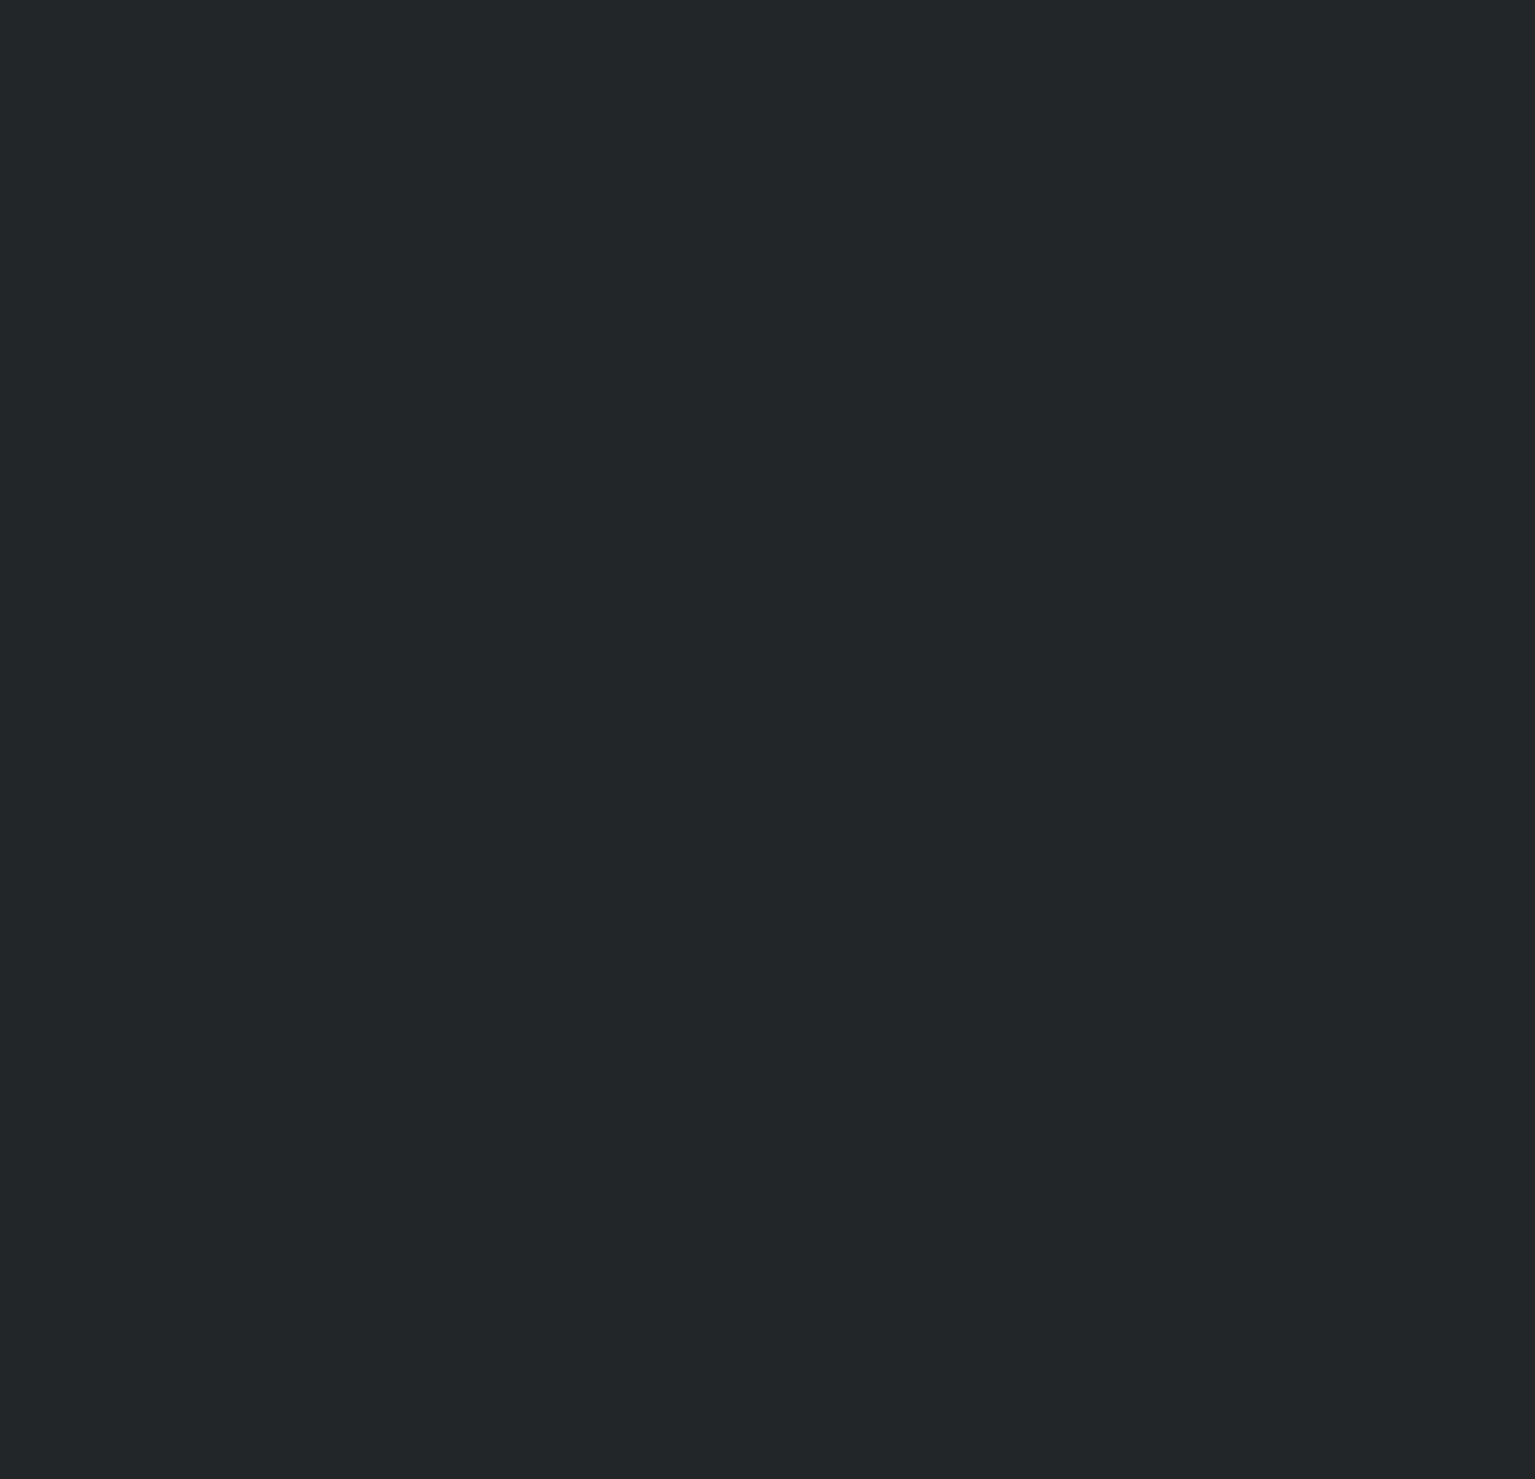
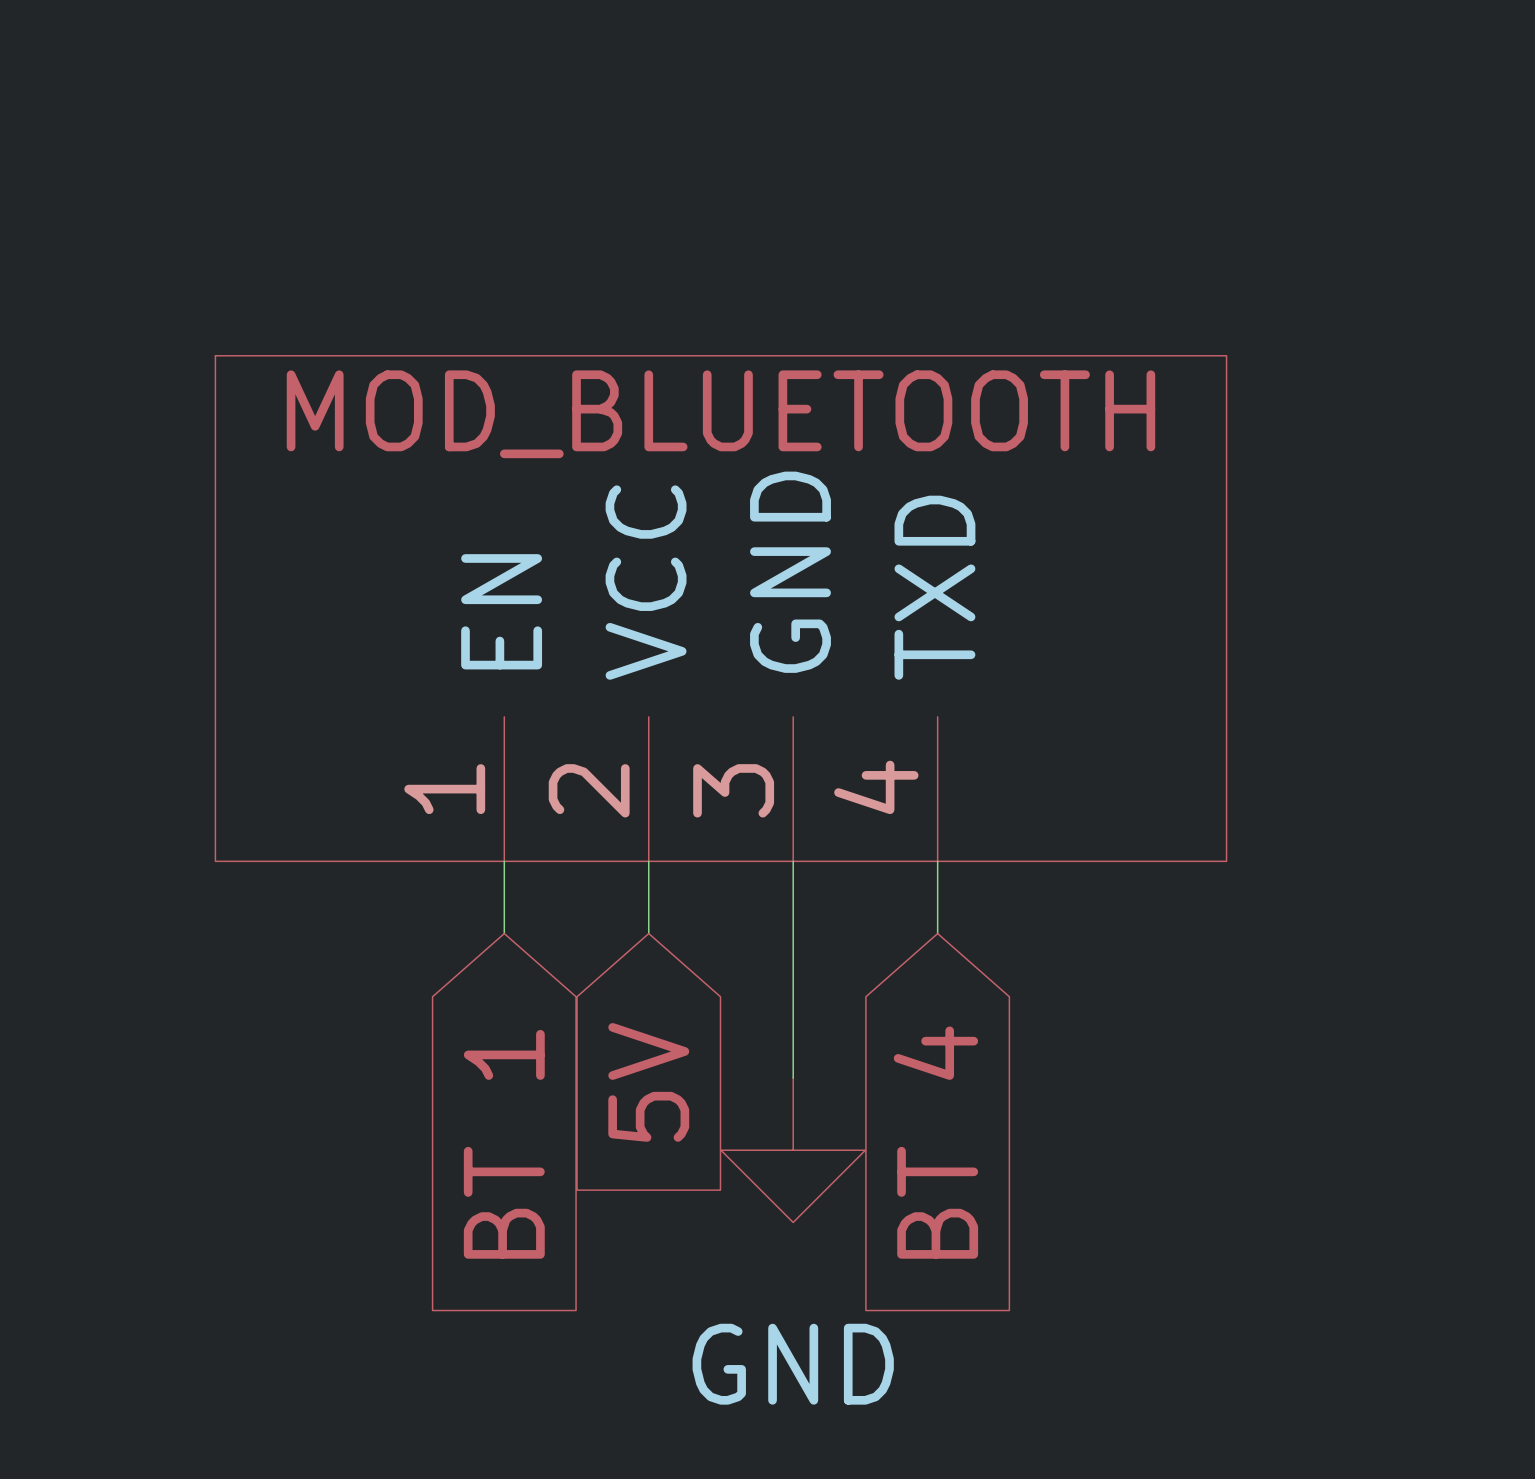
part: none -> (720, 608)
wire: none -> (504, 861) (504, 933)
wire: none -> (648, 861) (648, 933)
wire: none -> (793, 861) (793, 1078)
wire: none -> (937, 861) (937, 933)
global label: none -> 5V (648, 1082)
global label: none -> BT 4 (935, 1142)
global label: none -> BT 1 (504, 1144)
power symbol: none -> GND (793, 1150)

